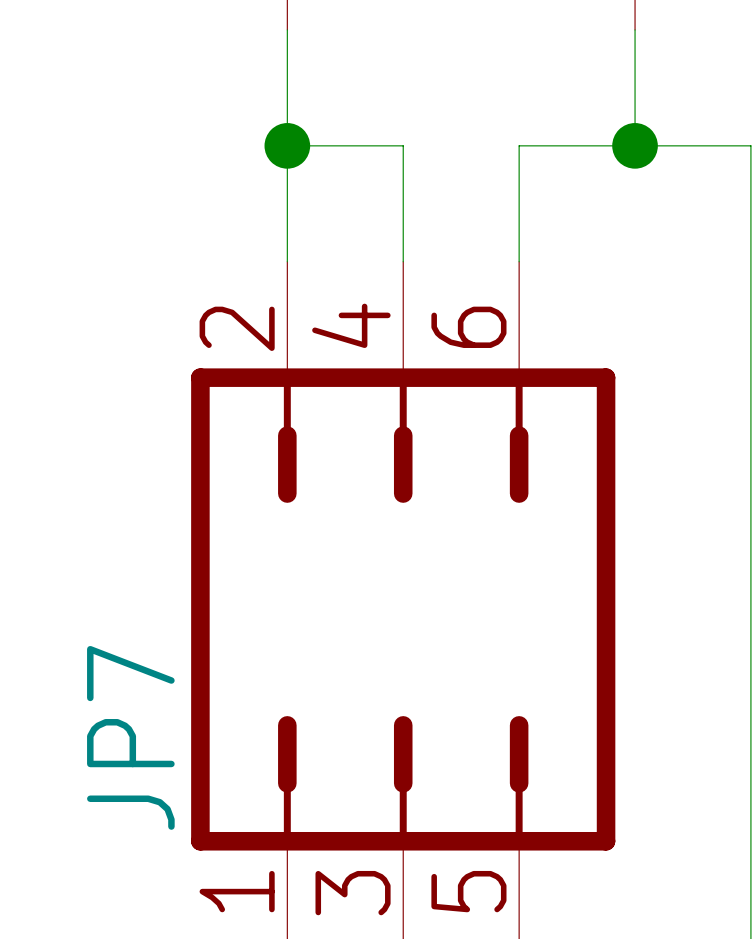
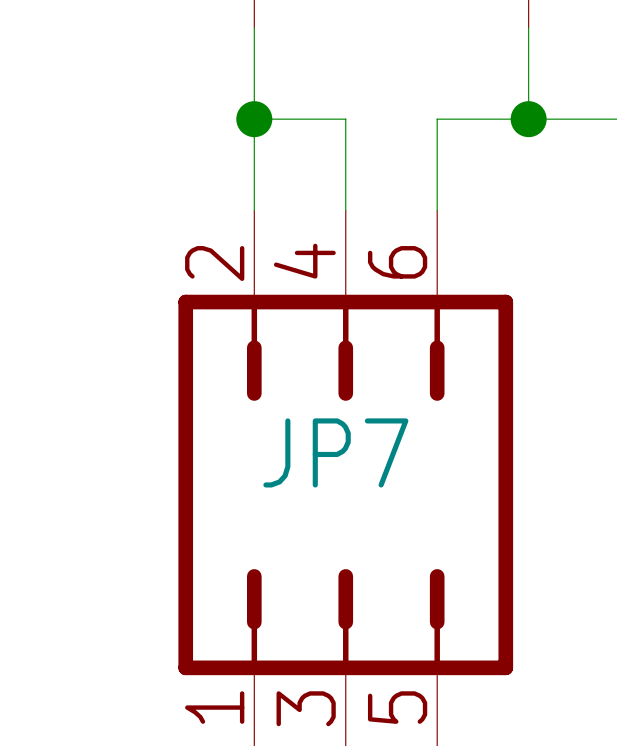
JP7 name rotation: 0° (130, 737) -> 90° clockwise (335, 452)
JP7 name position: JP7 (130, 737) -> JP7 (335, 452)

